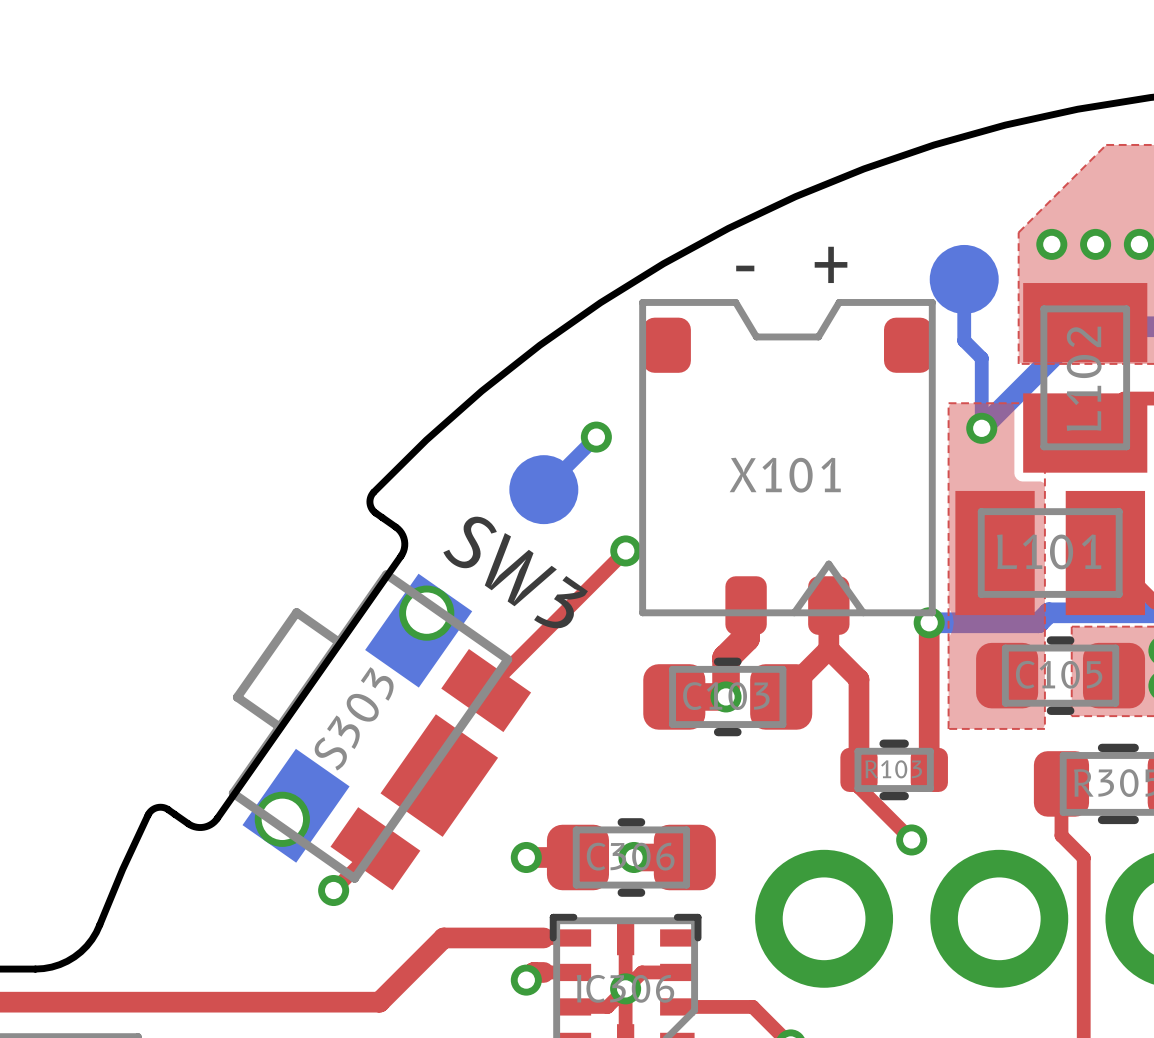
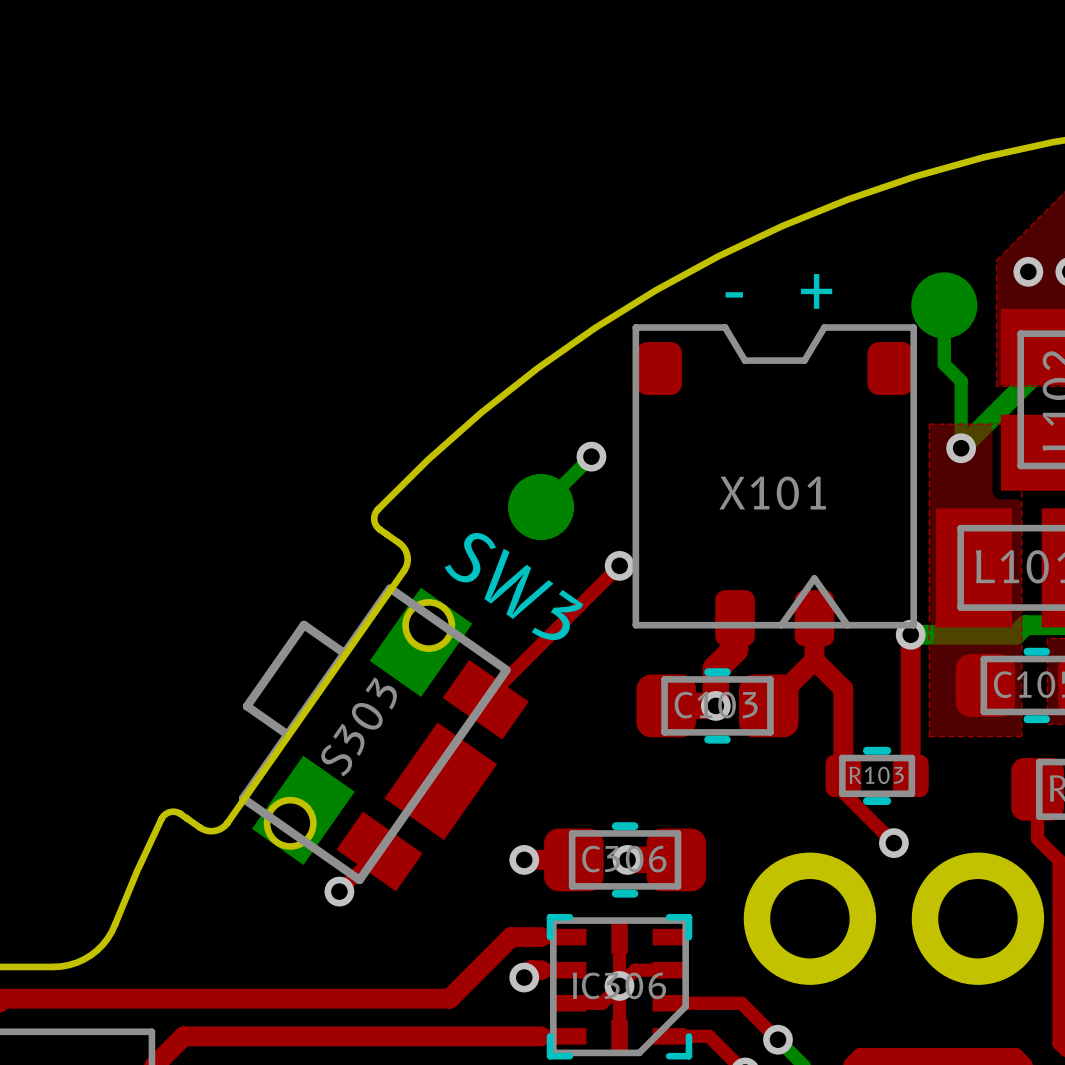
top track: (512, 937) (443, 937) (379, 1002) -> (511, 937) (449, 998) (383, 998)

